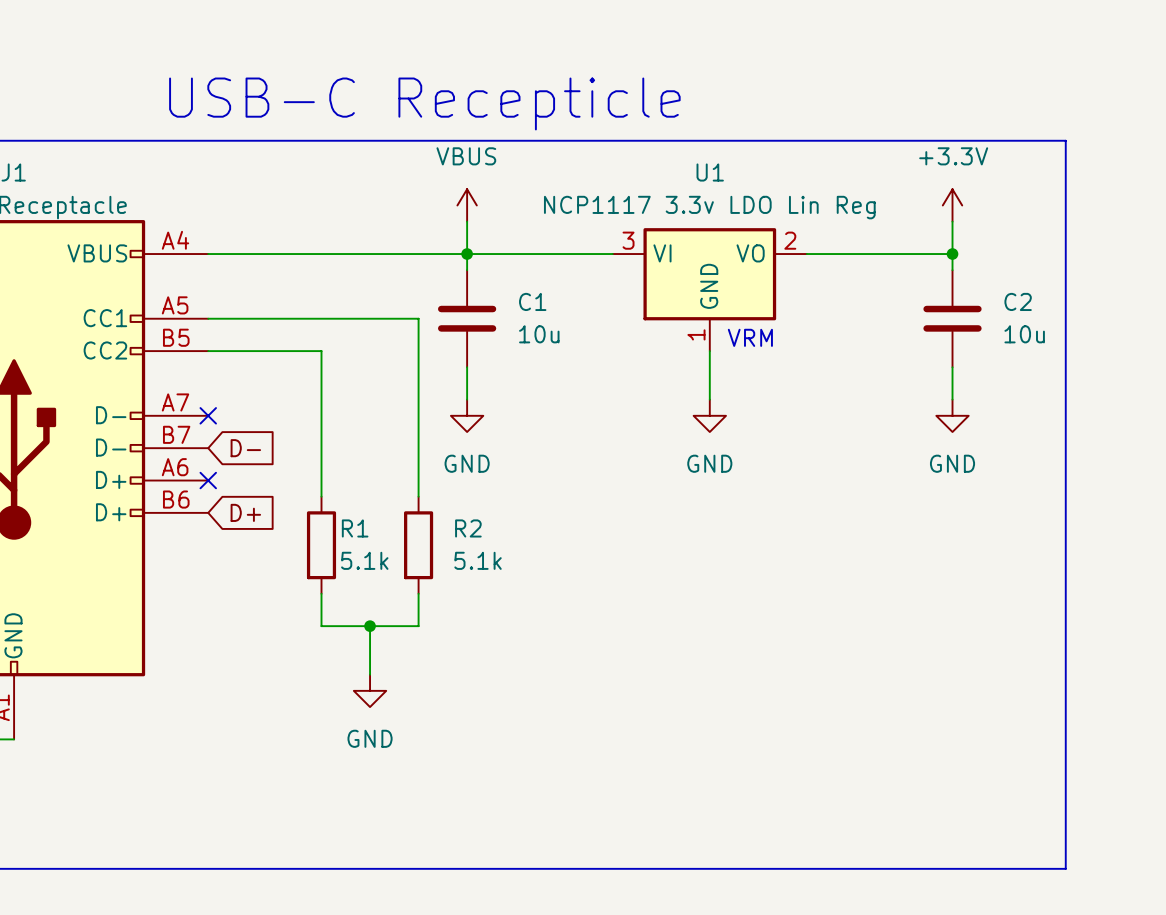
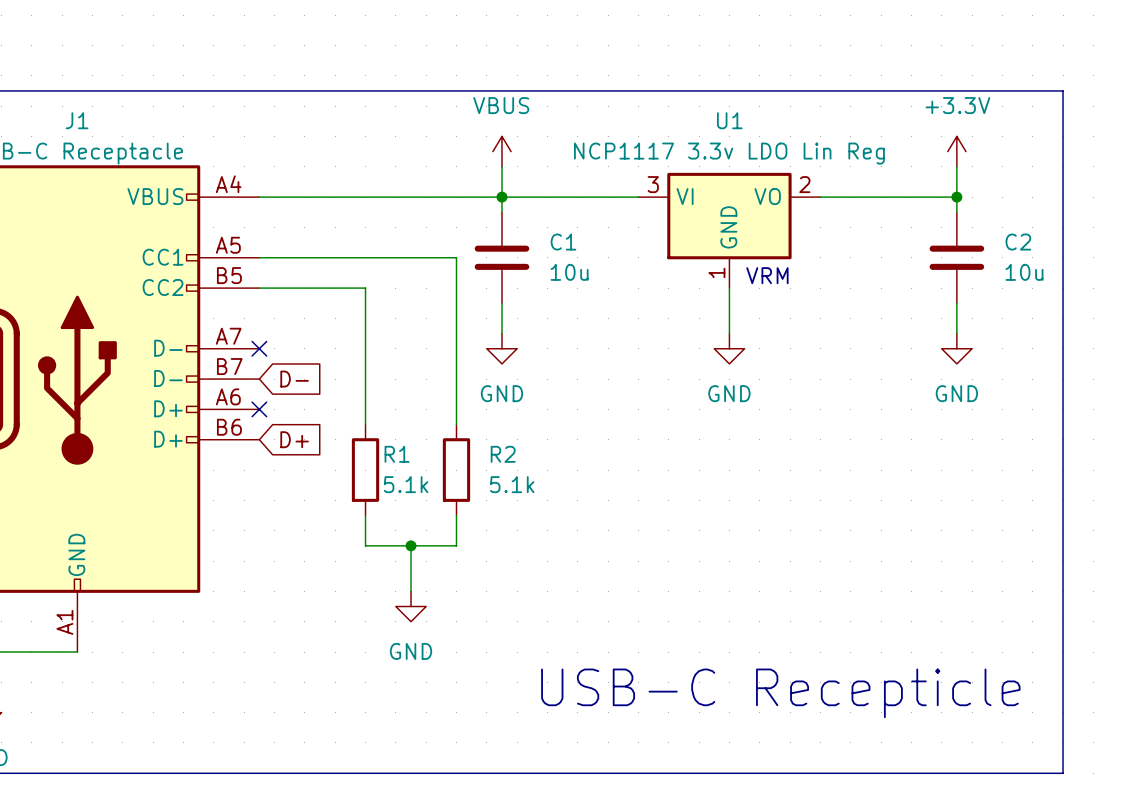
text: USB-C Recepticle (424, 103) -> none
text: none -> USB-C Recepticle (780, 693)

